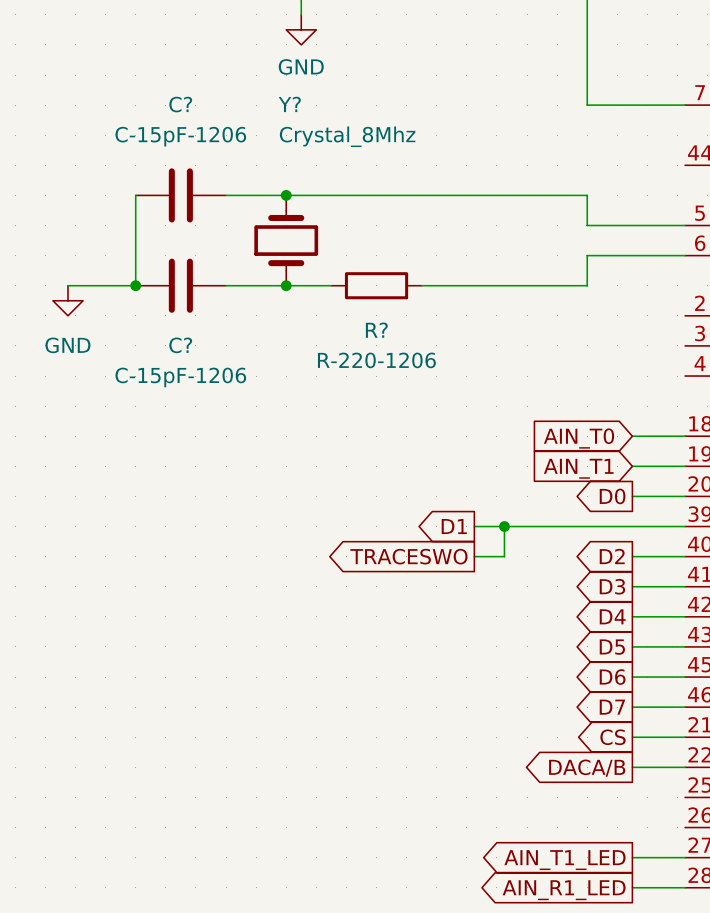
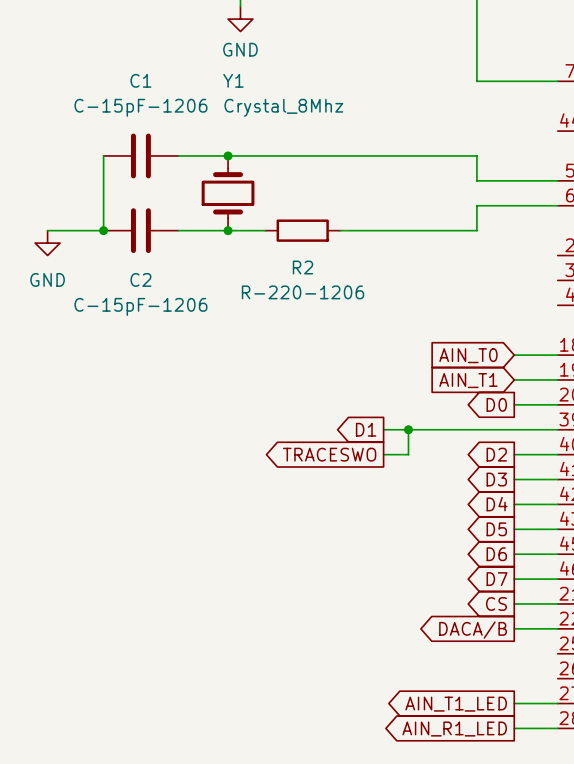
C? name: C? (180, 104) -> C1 (140, 80)
Y? name: Y? (289, 104) -> Y1 (233, 80)
R? name: R? (376, 330) -> R2 (303, 267)
C? name: C? (180, 345) -> C2 (140, 279)

